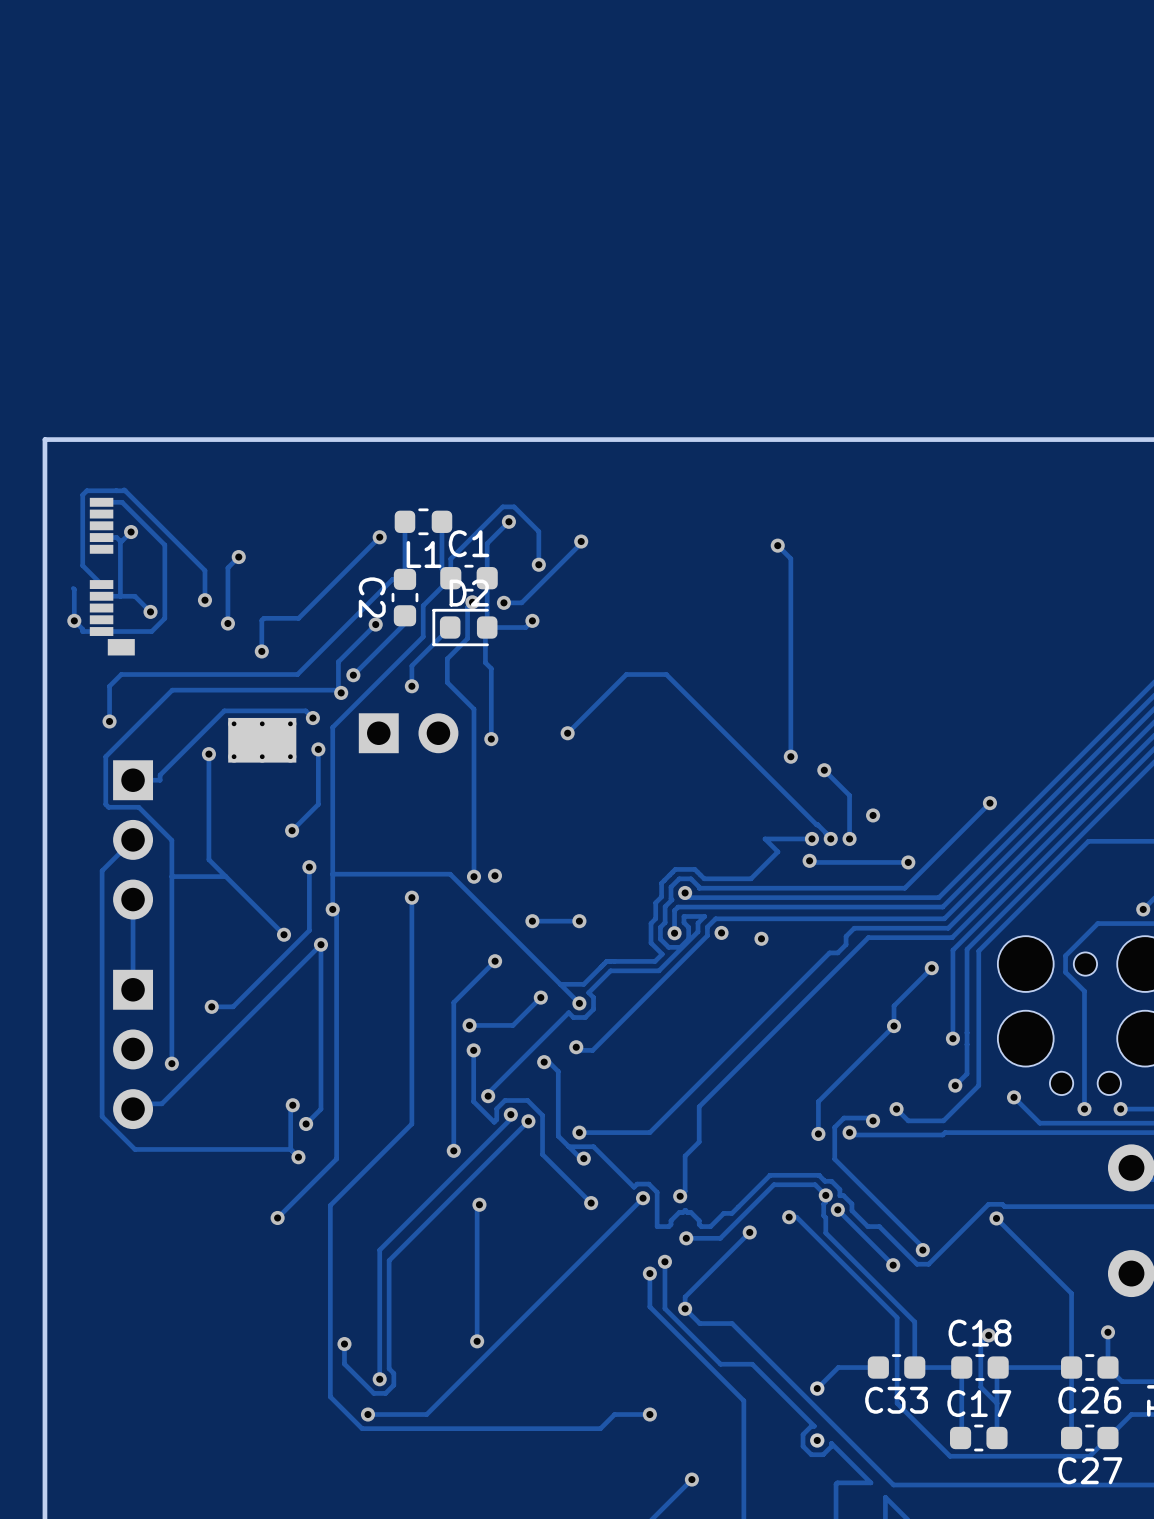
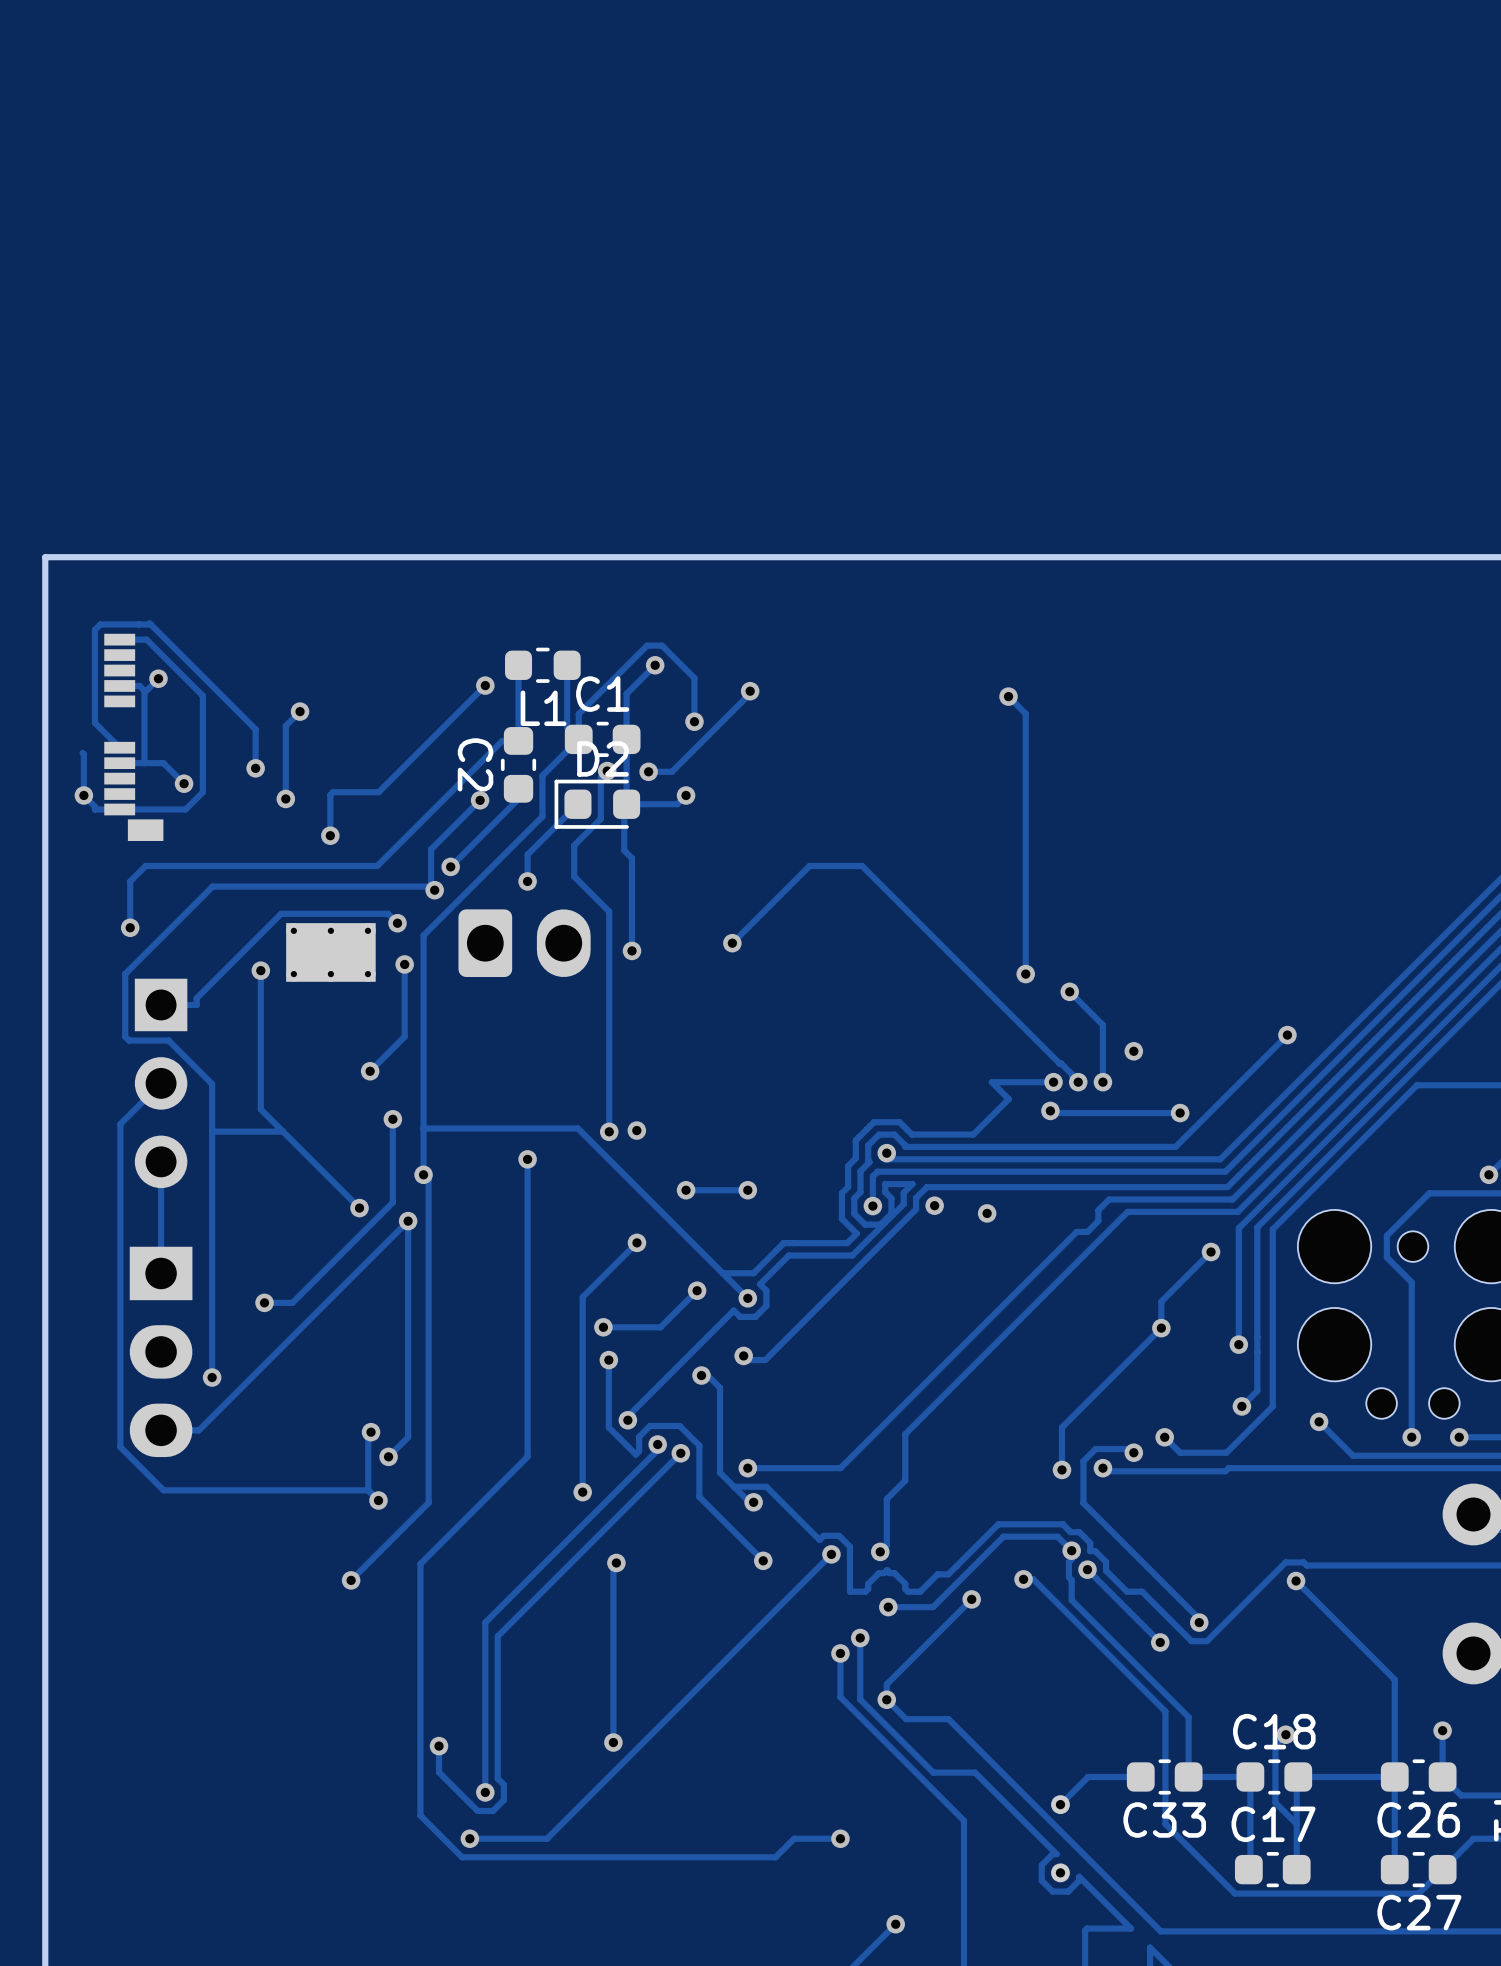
part footprint: [358, 713, 459, 754] -> [458, 909, 591, 978]
part footprint: [113, 969, 154, 1130] -> [129, 1246, 193, 1458]

